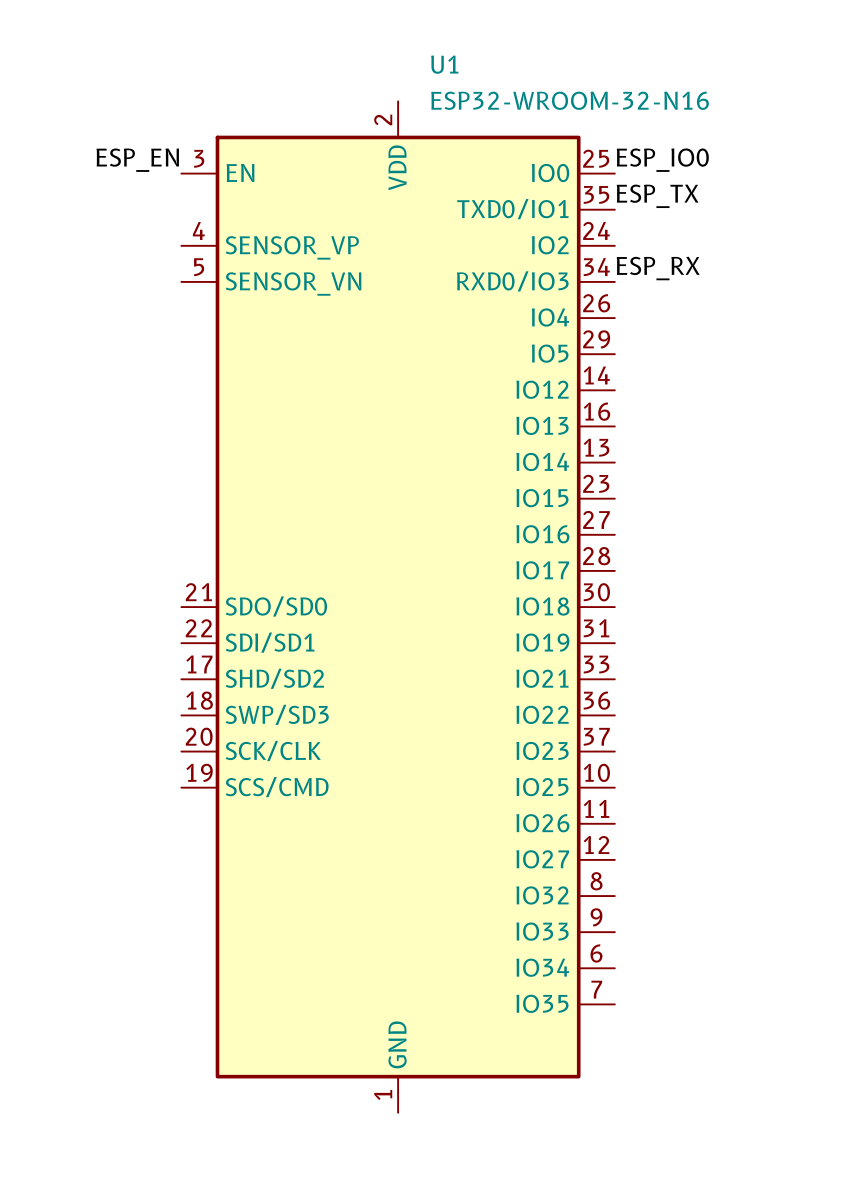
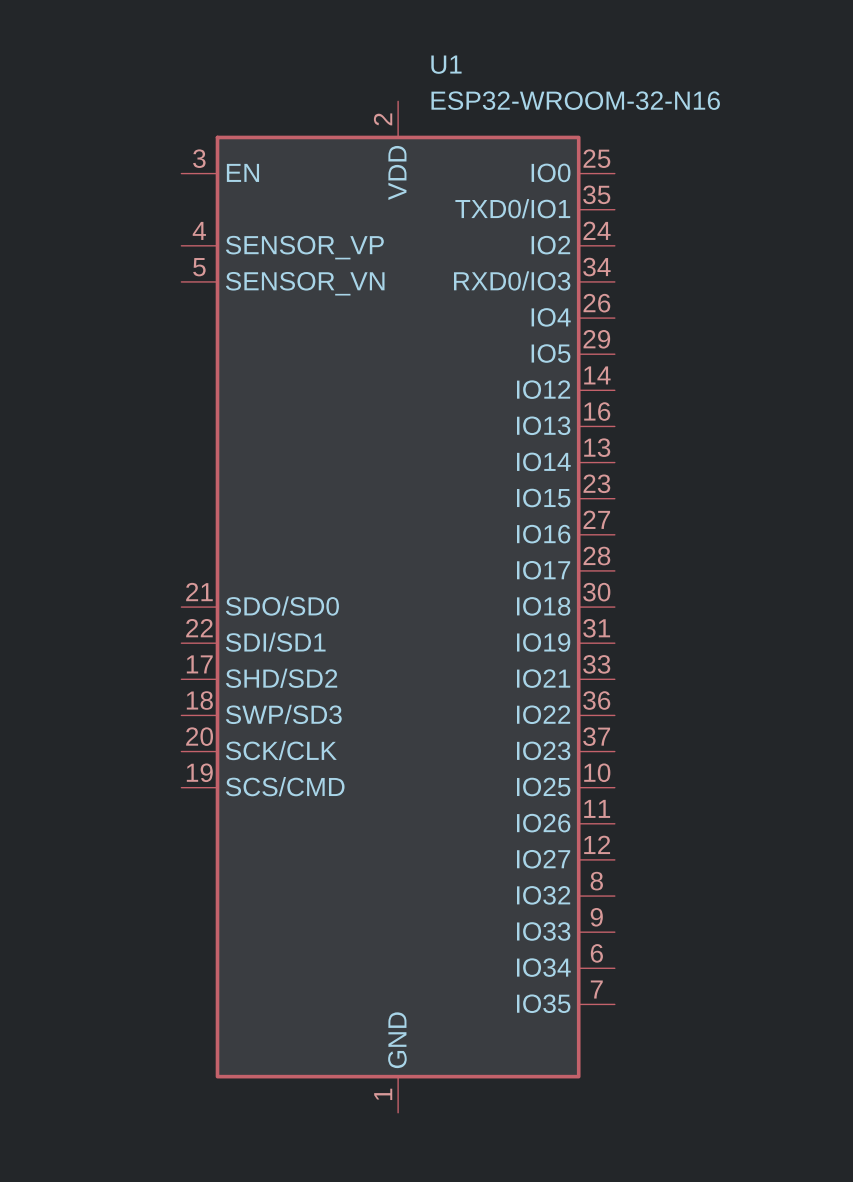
label: ESP_EN (137, 160) -> none
label: ESP_IO0 (662, 160) -> none
label: ESP_TX (657, 196) -> none
label: ESP_RX (658, 268) -> none

